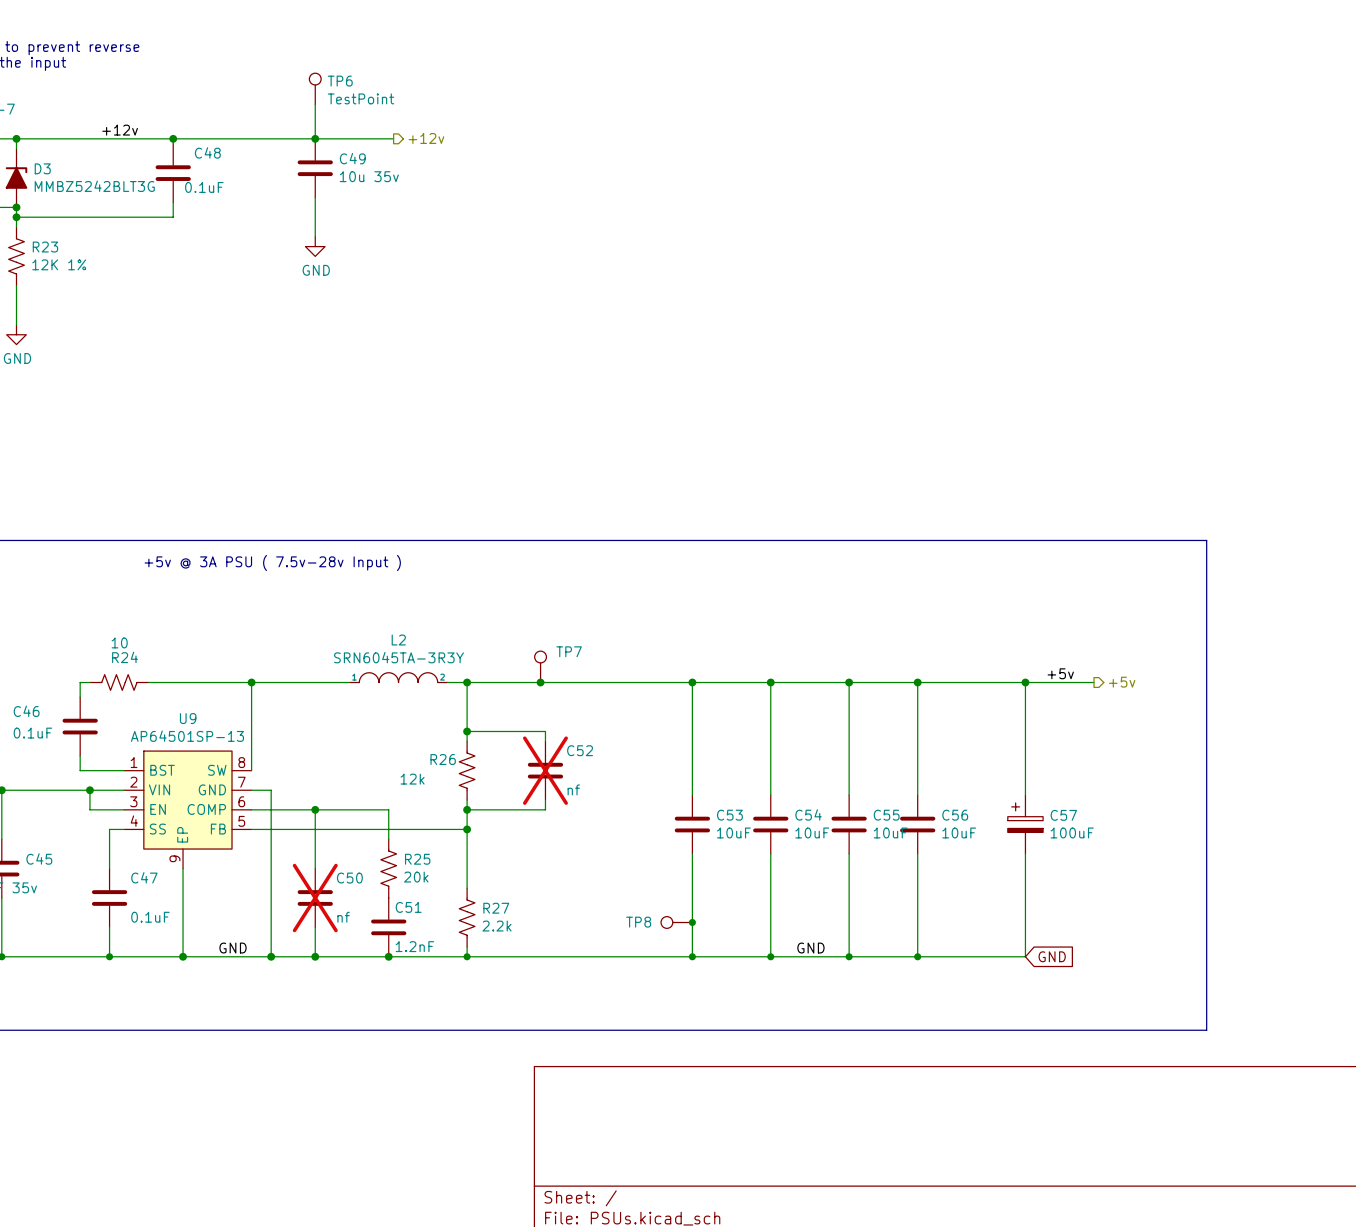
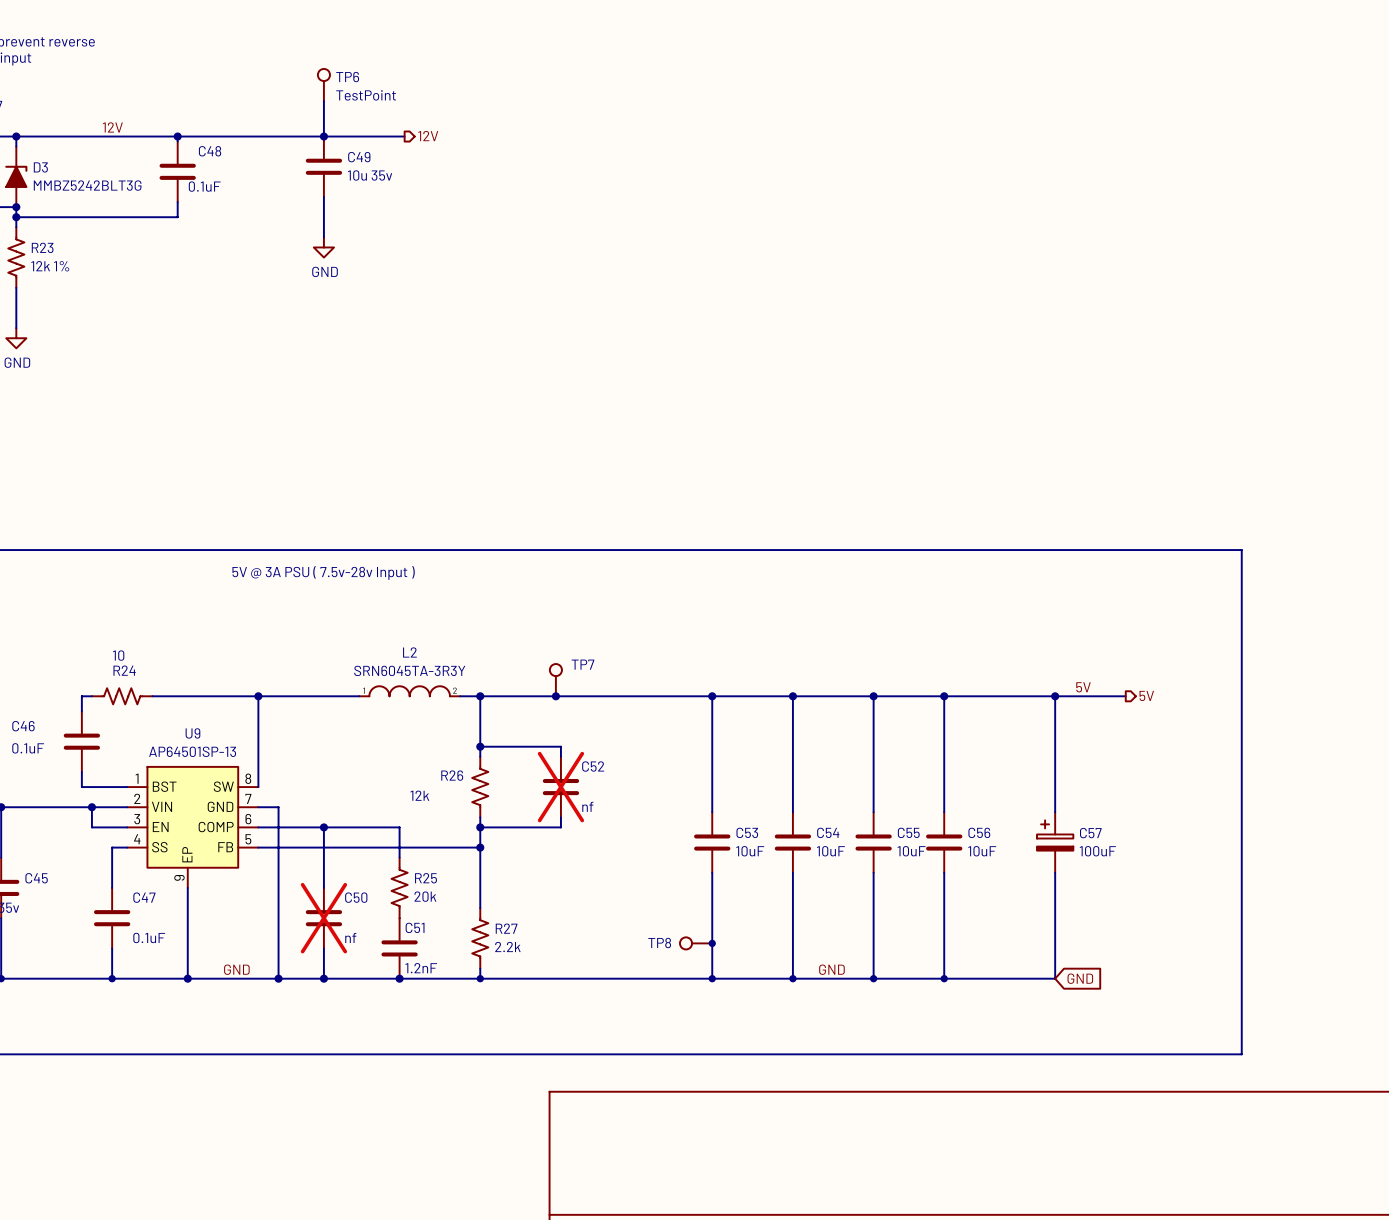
label: +12v (120, 130) -> 12V (112, 127)
hierarchical label: +12v (426, 138) -> 12V (428, 136)
R23 value: 12K 1% (59, 264) -> 12k 1% (50, 266)
text: +5v @ 3A PSU ( 7.5v-28v Input ) (272, 562) -> 5V @ 3A PSU ( 7.5v-28v Input ) (323, 572)
label: +5v (1060, 673) -> 5V (1083, 687)
hierarchical label: +5v (1122, 682) -> 5V (1146, 695)

